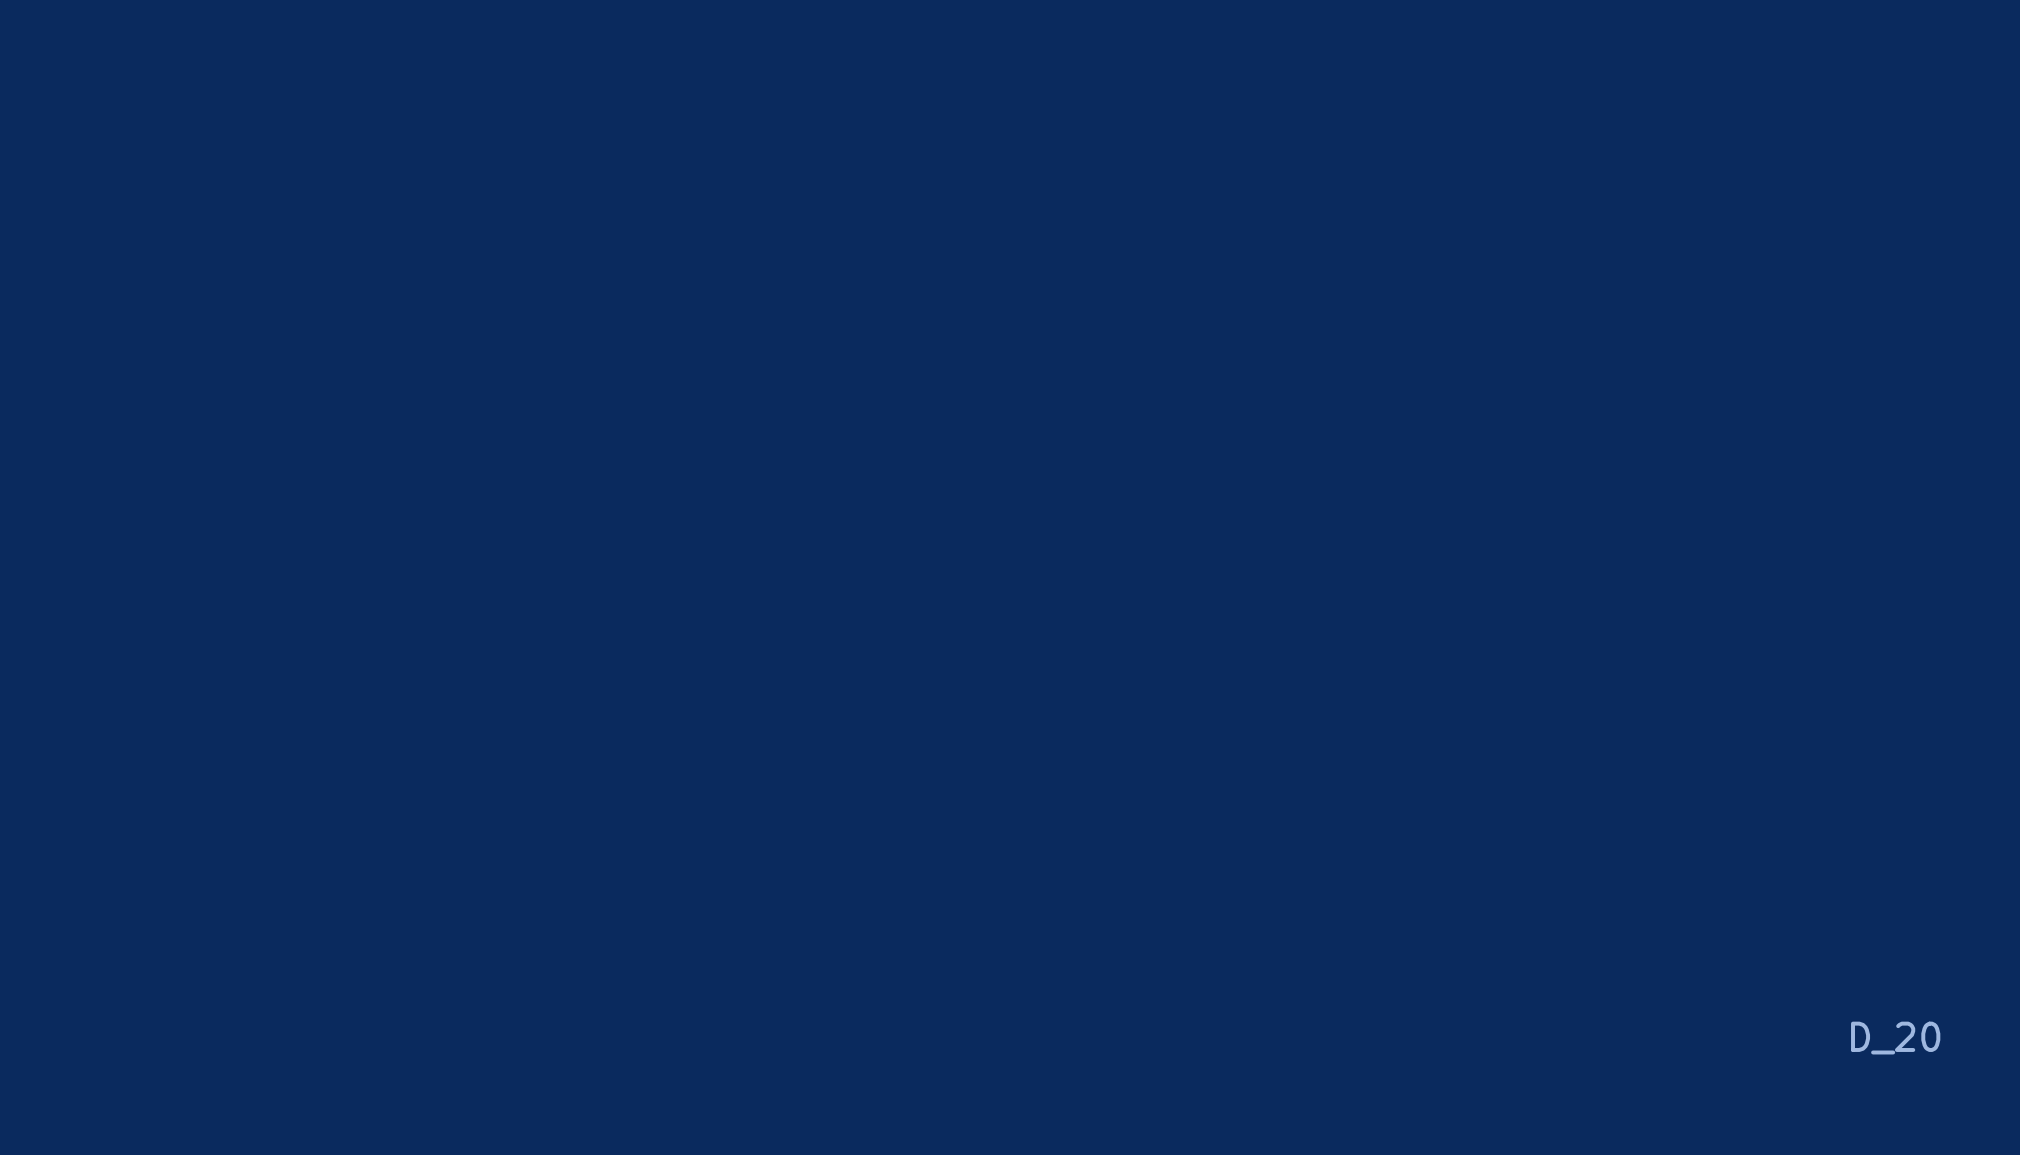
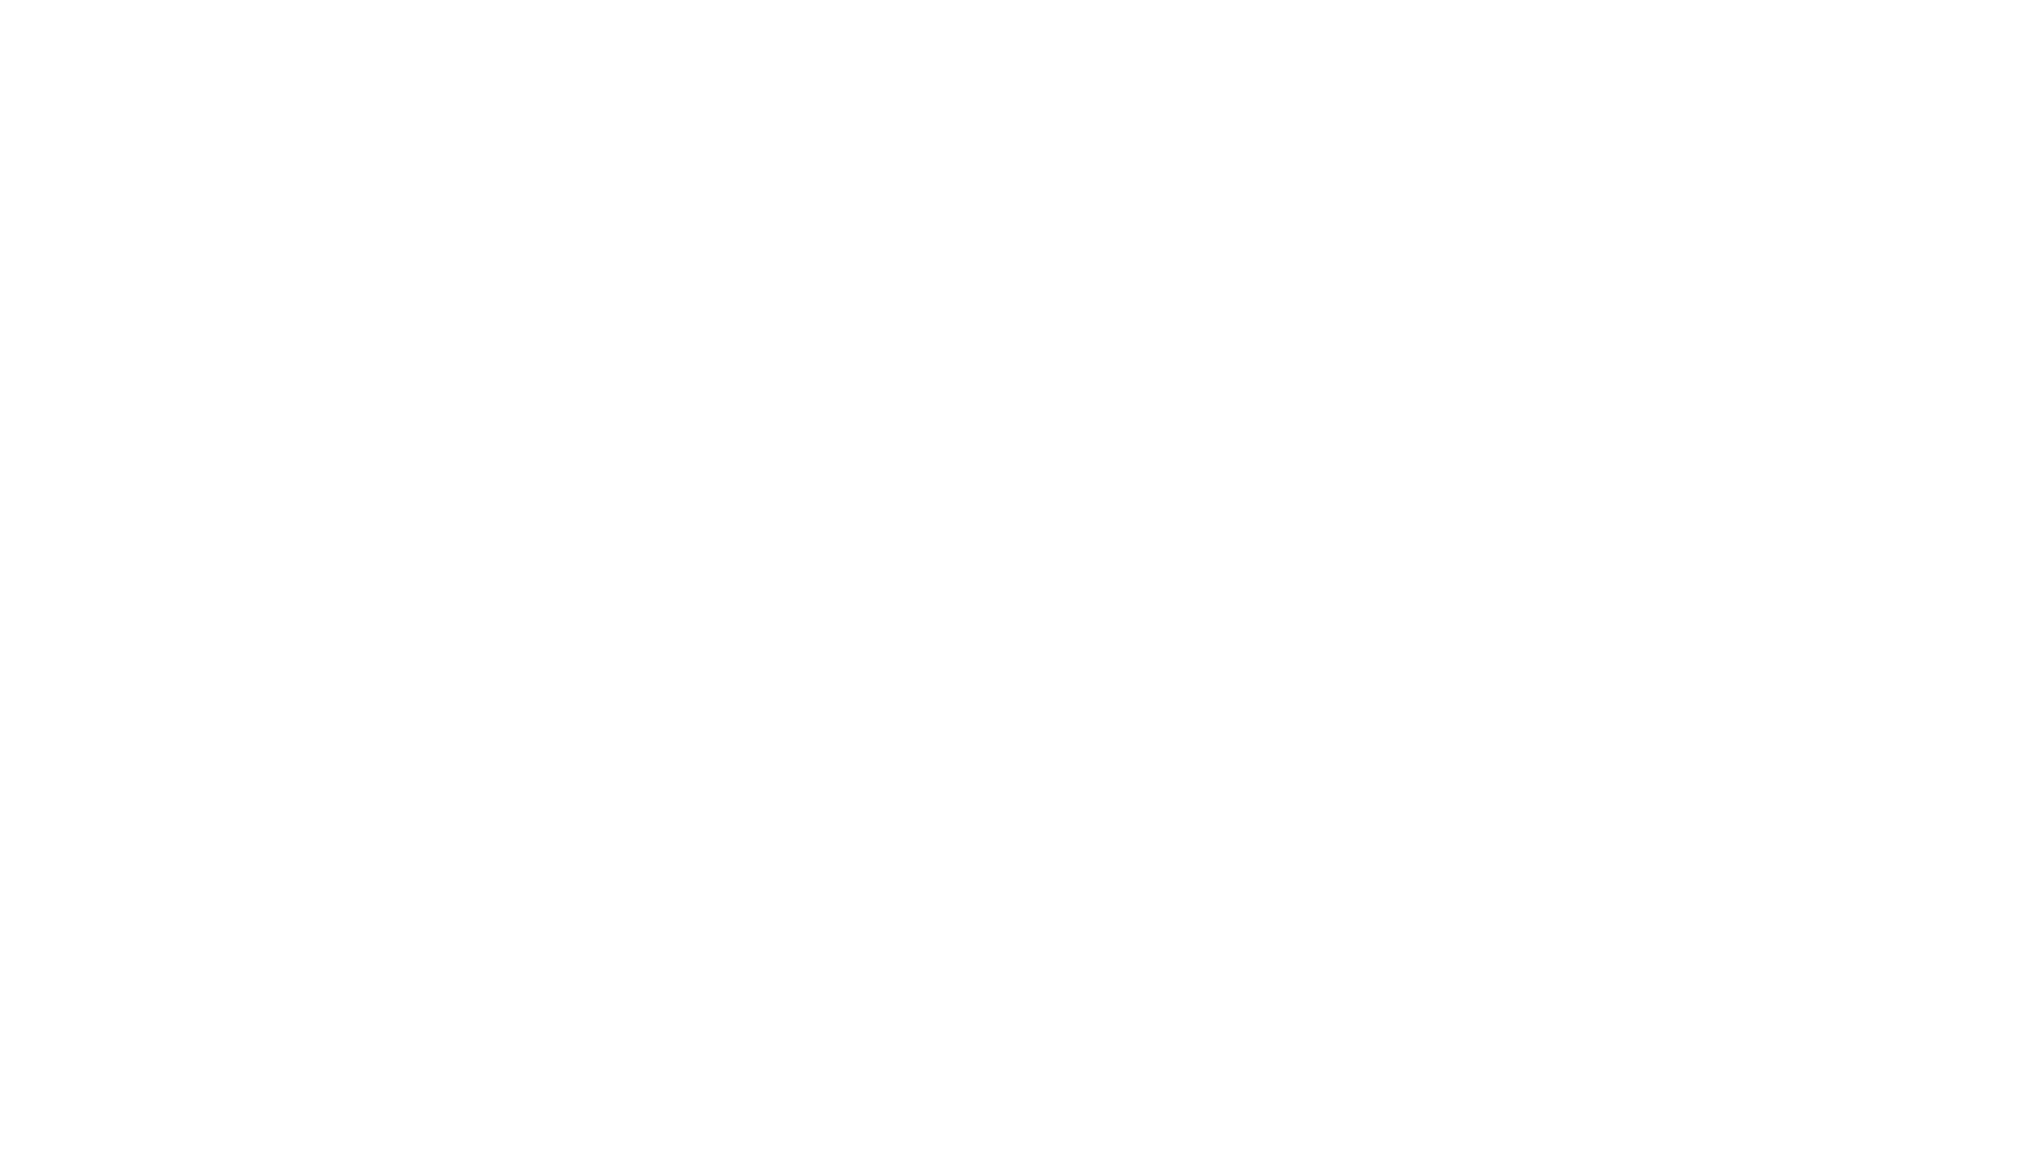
D_20: (1895, 1038) -> none

